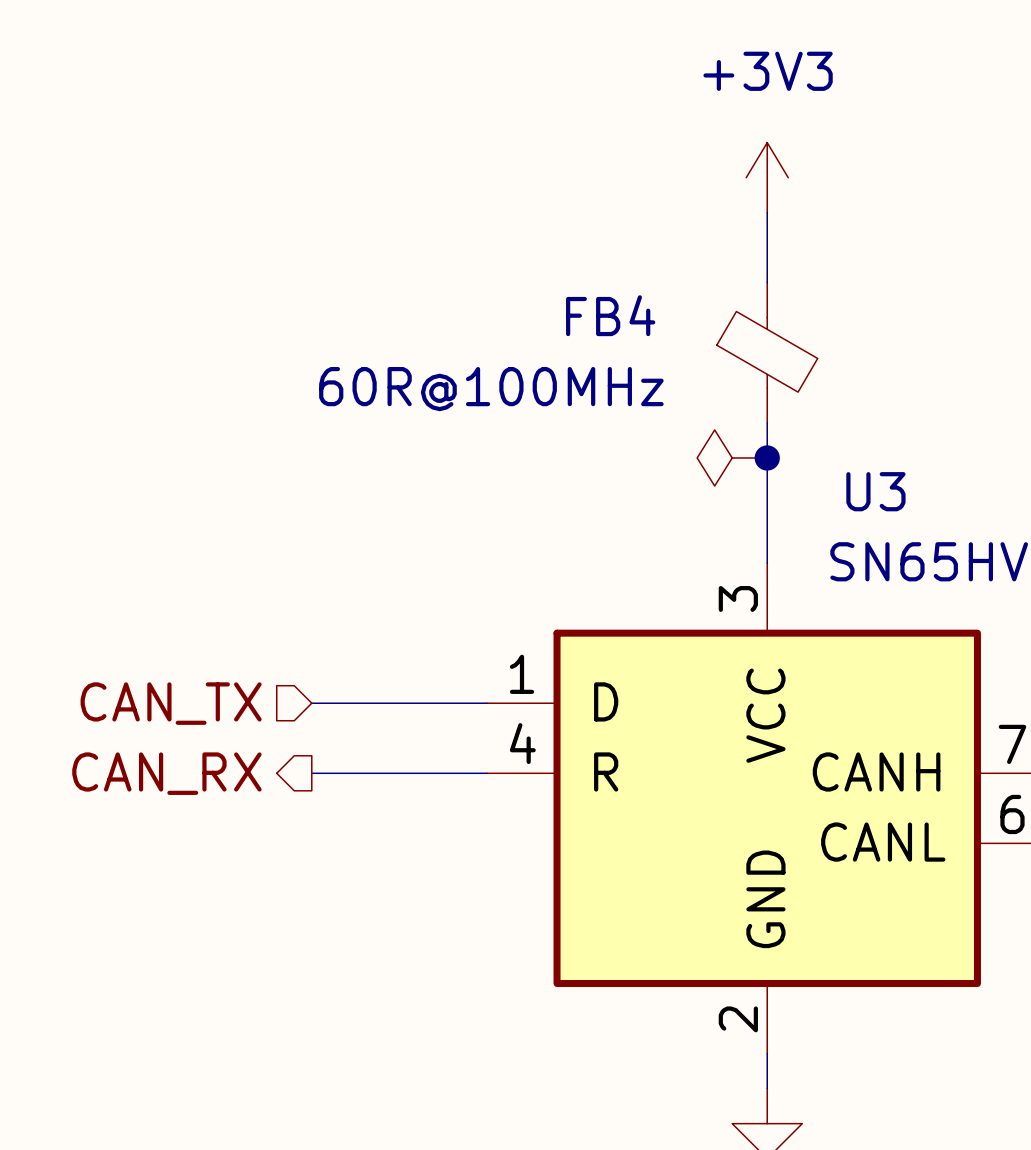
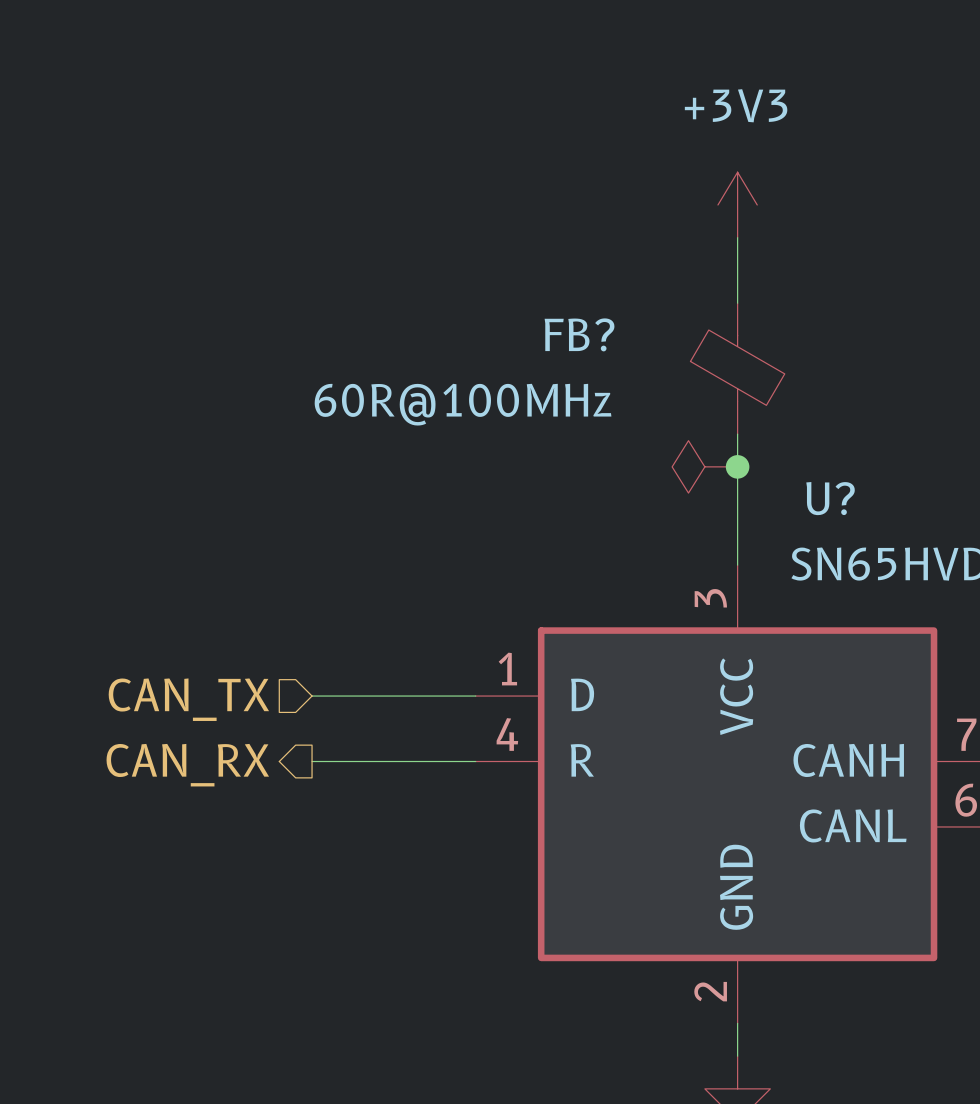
FB4 name: FB4 (610, 315) -> FB? (579, 334)
U3 name: U3 (875, 491) -> U? (830, 498)

